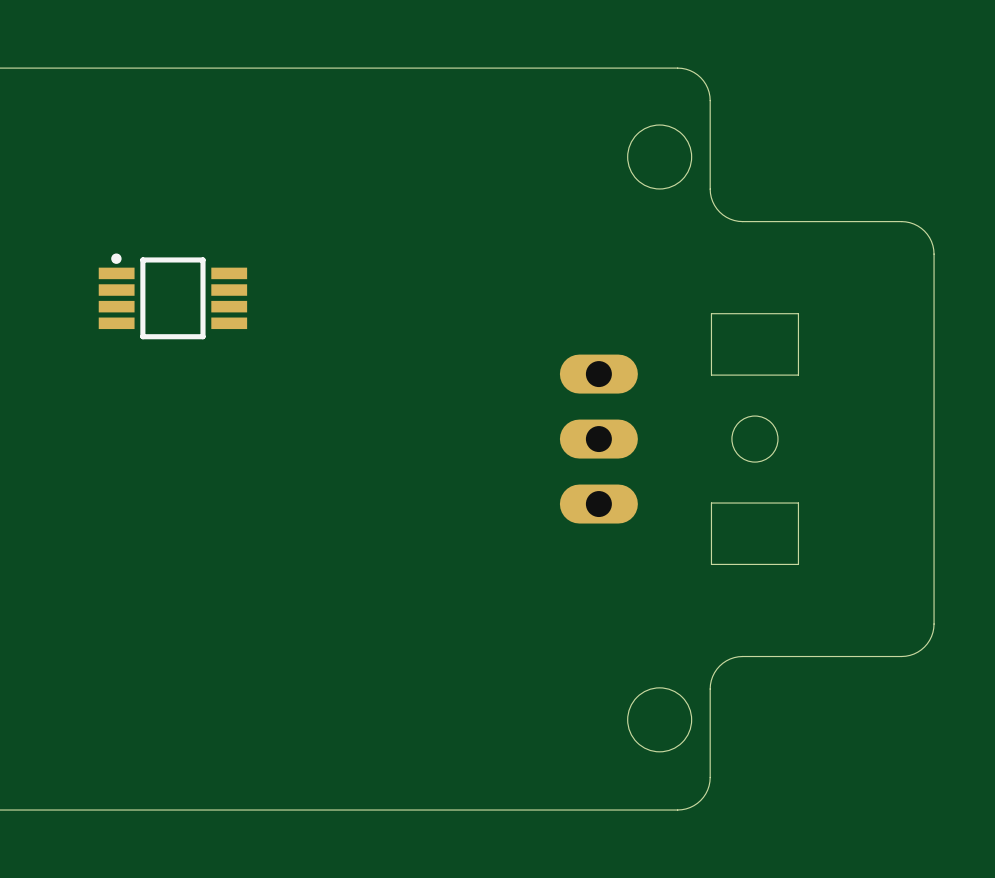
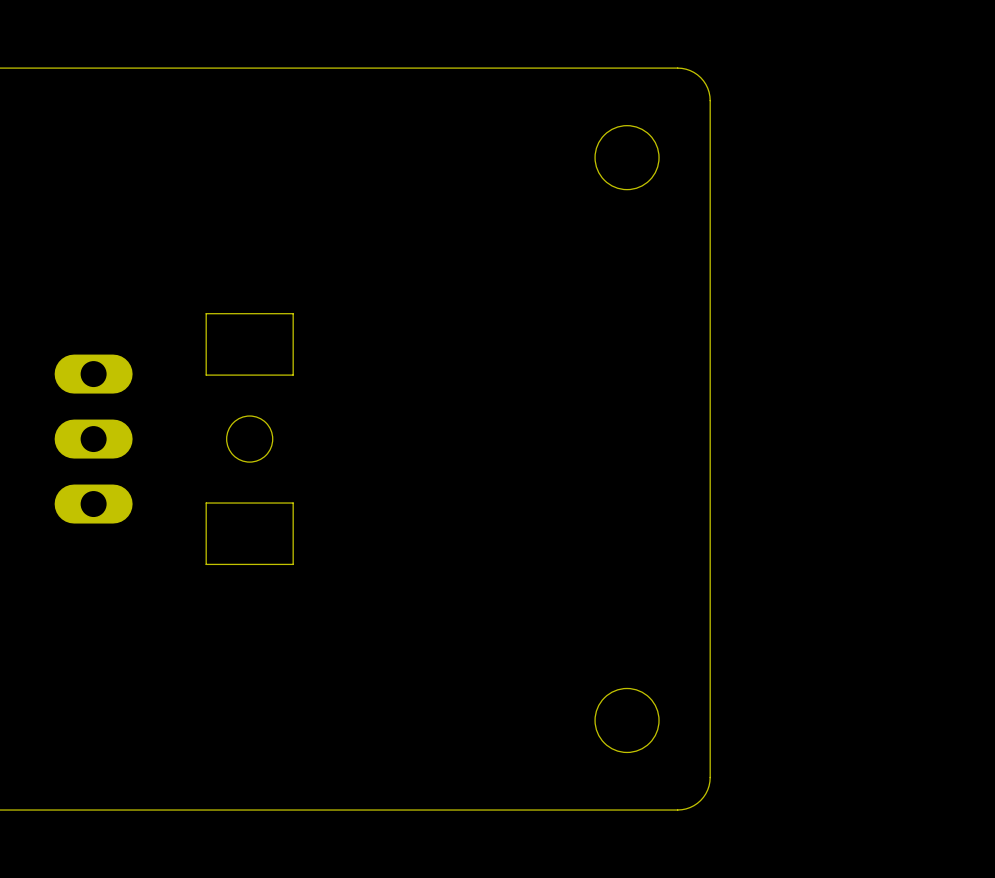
round board edge position: (659, 156) -> (627, 157)
board edge: (710, 189) (711, 197) (716, 208) (726, 217) (734, 220) (905, 221) (917, 225) (927, 234) (932, 245) (934, 254) (934, 624) (929, 640) (917, 652) (905, 656) (734, 657) (726, 660) (716, 669) (711, 680) (710, 689) -> (710, 189) (710, 689)
part: (172, 296) -> none
board edge: (798, 313) (798, 375) (711, 375) (711, 313) (798, 313) -> (293, 313) (293, 375) (206, 375) (206, 313) (293, 313)
part position: (598, 439) -> (93, 439)
round board edge position: (754, 439) -> (249, 439)
board edge: (798, 503) (798, 564) (711, 564) (711, 503) (798, 503) -> (293, 503) (293, 564) (206, 564) (206, 503) (293, 503)
round board edge position: (659, 719) -> (627, 720)

